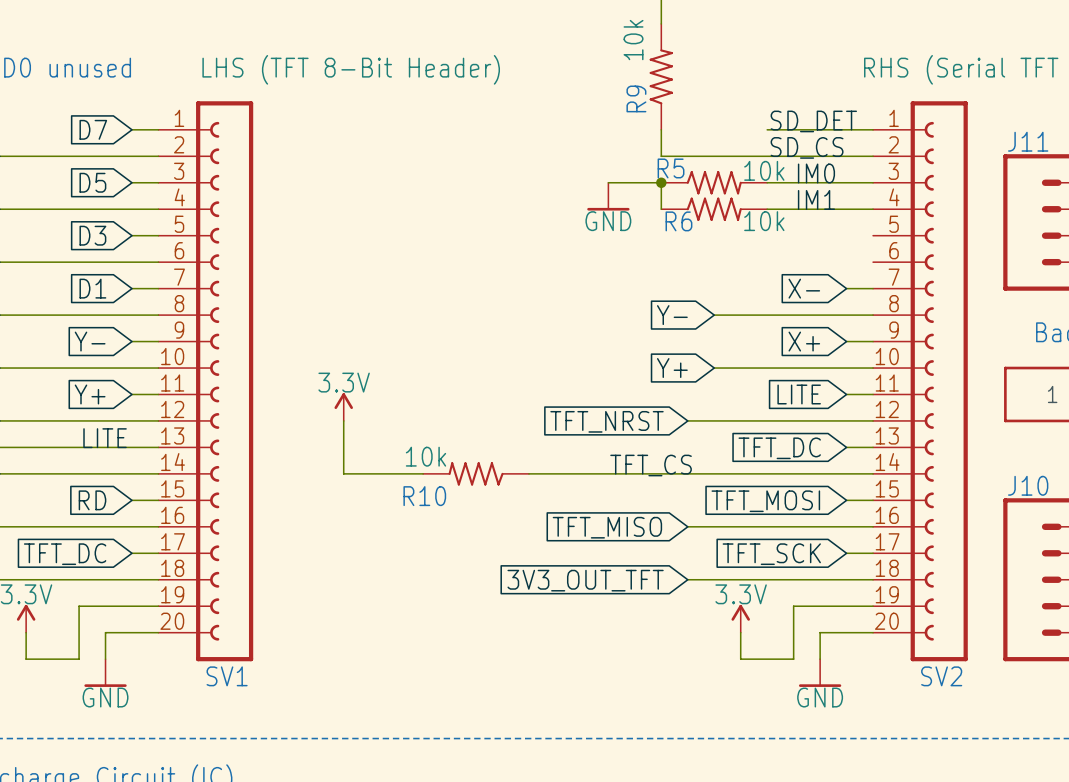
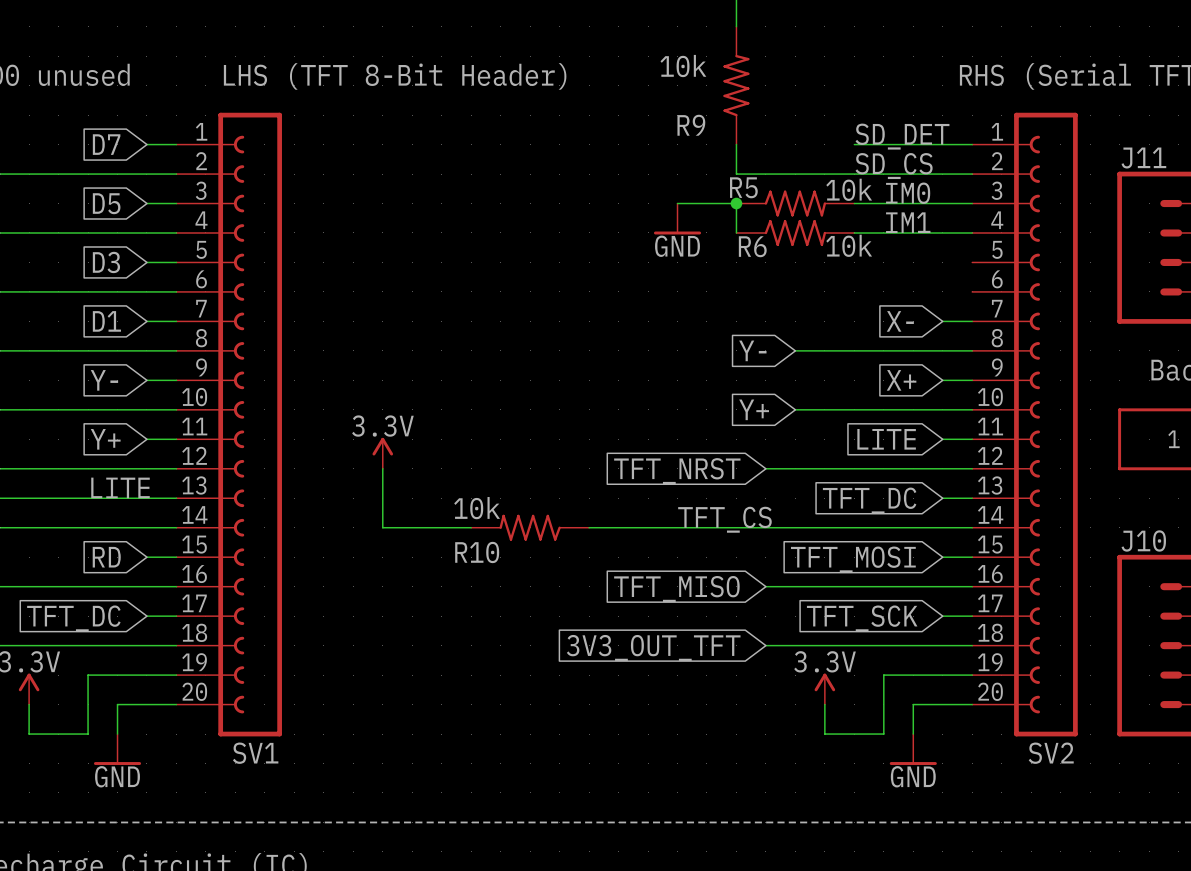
R9 value rotation: 0° (633, 40) -> 90° clockwise (683, 66)
R9 name rotation: 0° (636, 98) -> 90° clockwise (691, 125)

